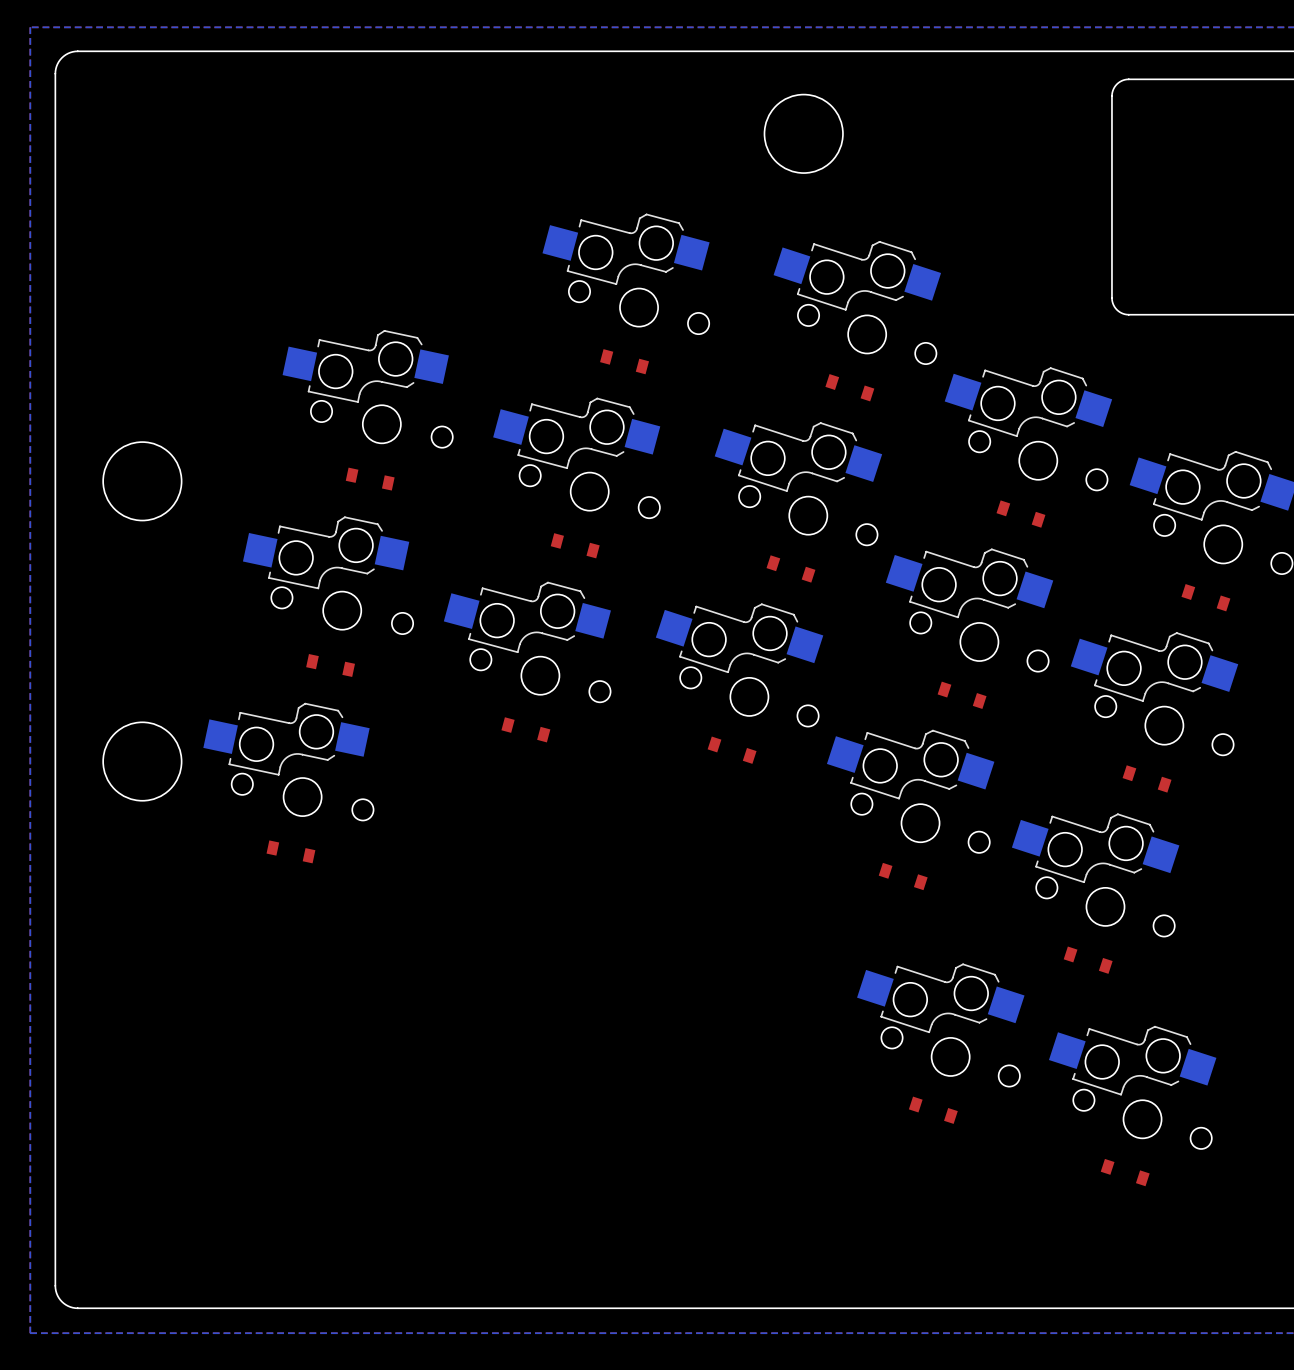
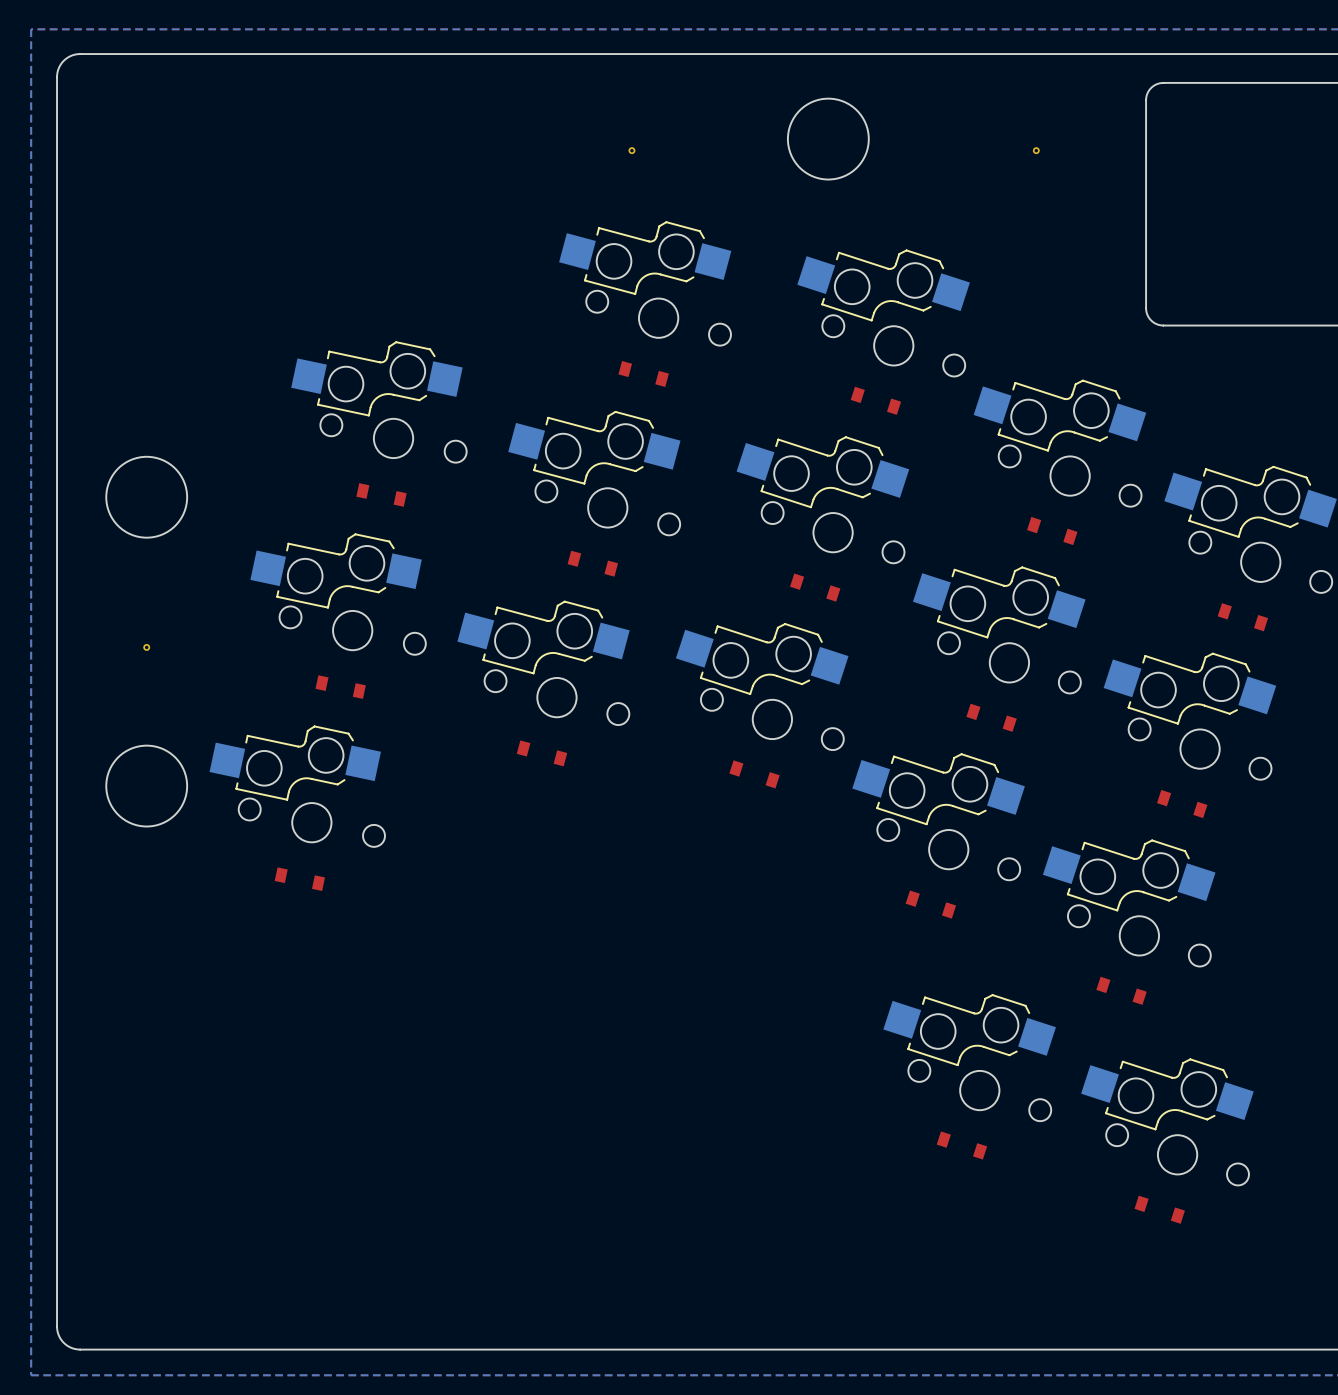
part: none -> (631, 150)
part: none -> (1036, 150)
part: none -> (146, 647)

